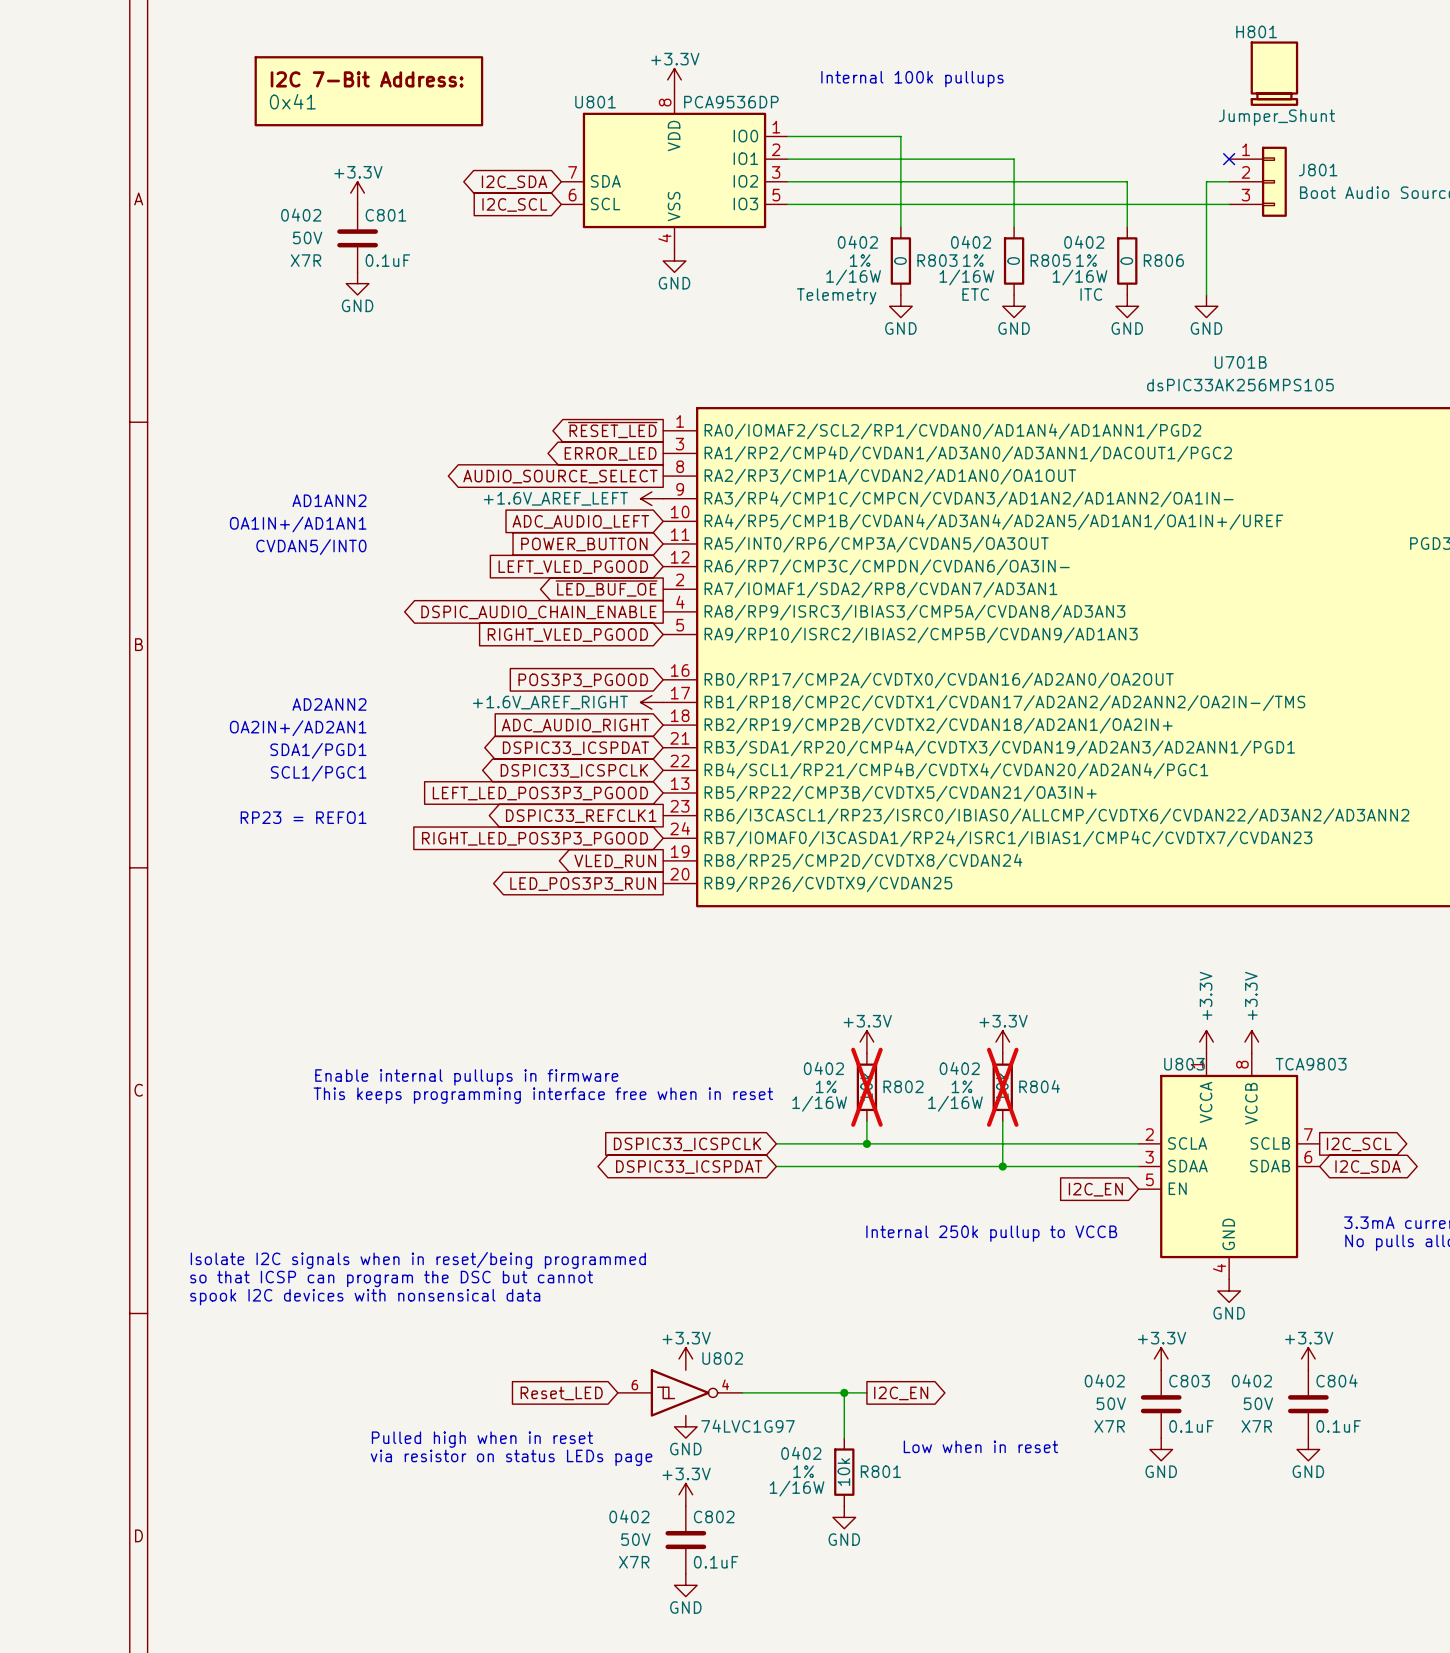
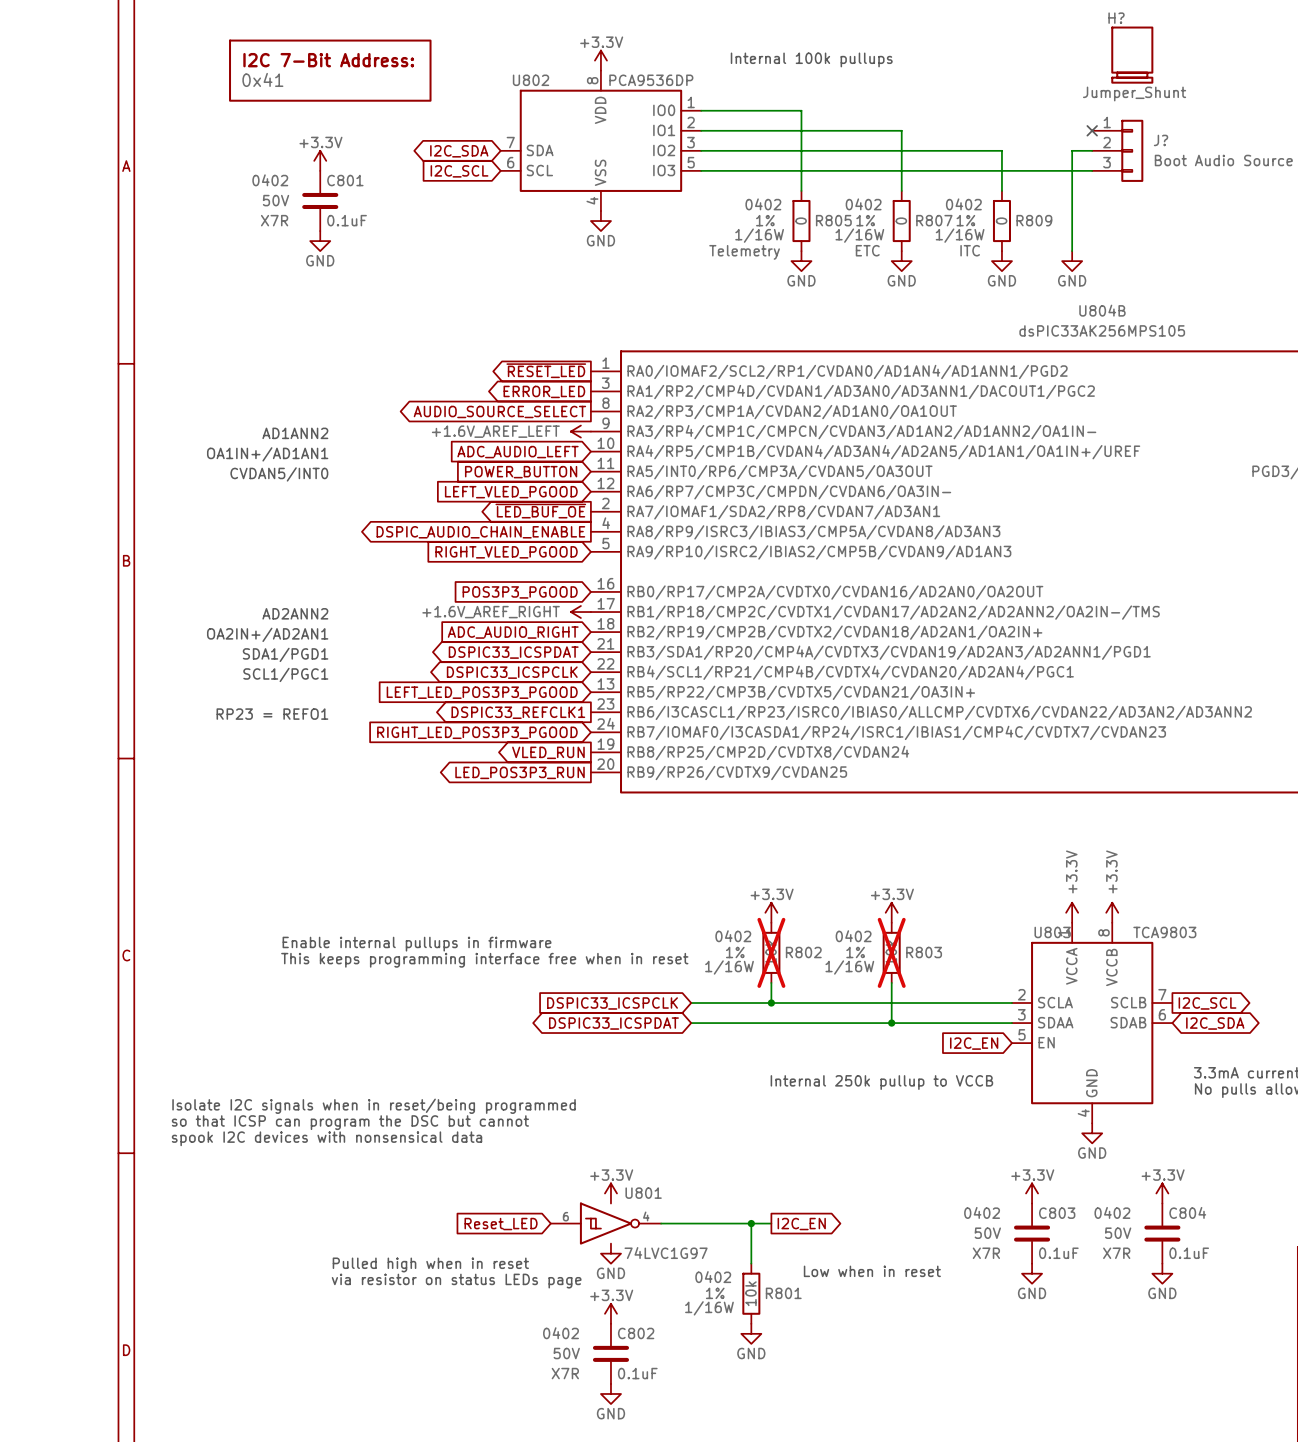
H801 name: H801 (1256, 31) -> H? (1116, 18)
U801 name: U801 (595, 102) -> U802 (531, 80)
J801 name: J801 (1318, 170) -> J? (1161, 140)
R803 name: R803 (937, 260) -> R805 (833, 220)
R805 name: R805 (1050, 260) -> R807 (934, 220)
R806 name: R806 (1163, 260) -> R809 (1034, 220)
U701B name: U701B (1240, 362) -> U804B (1102, 310)
R804 name: R804 (1039, 1086) -> R803 (924, 952)
U802 name: U802 (722, 1358) -> U801 (643, 1193)

